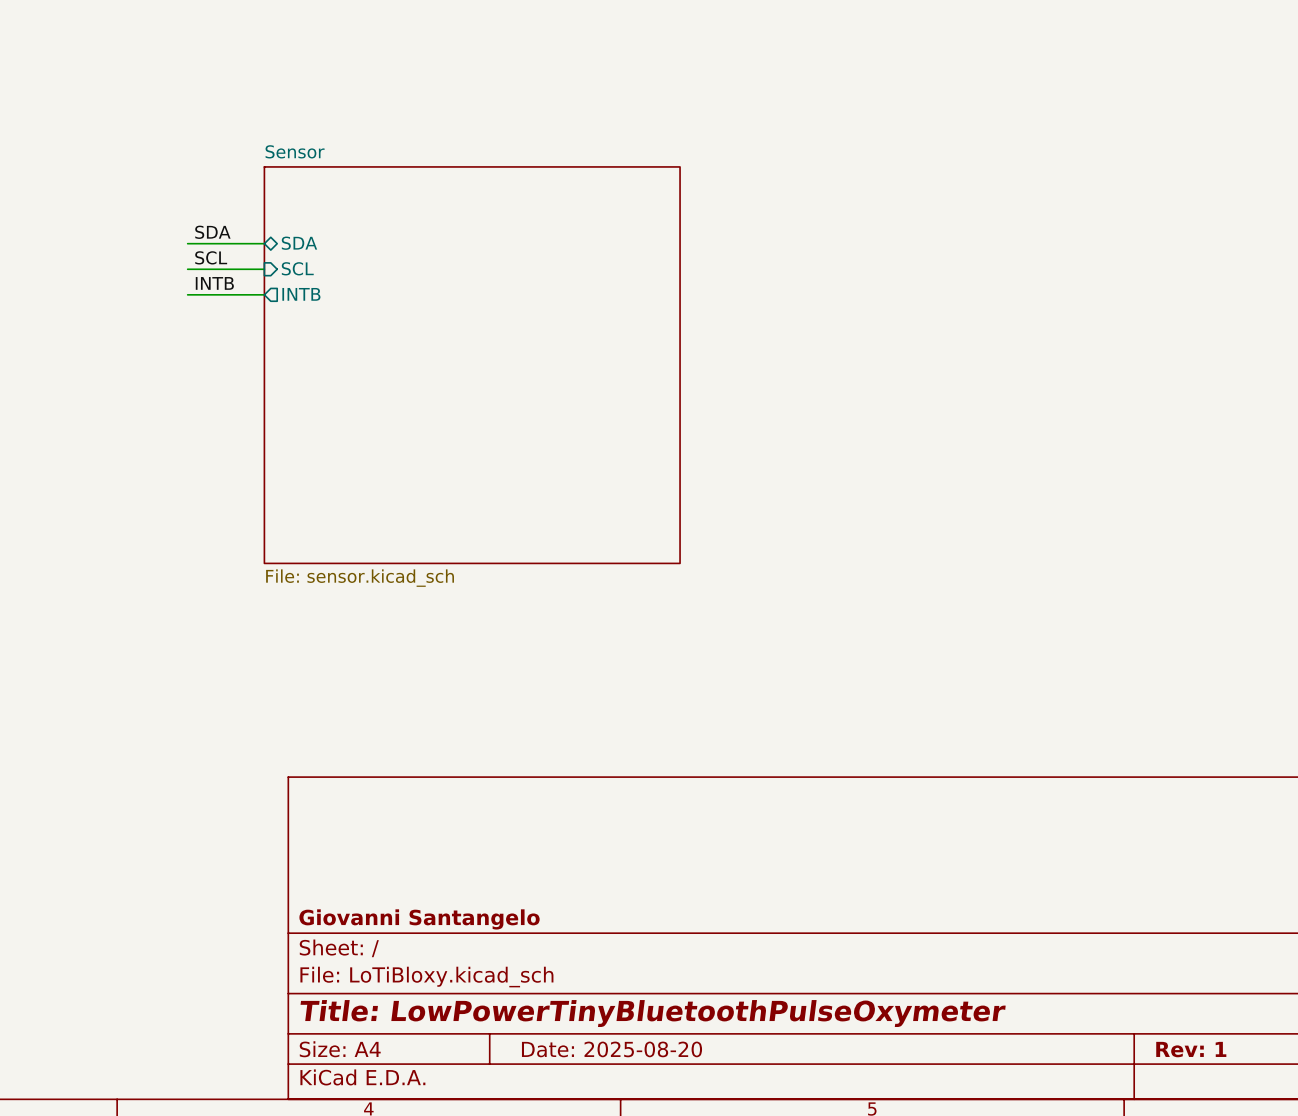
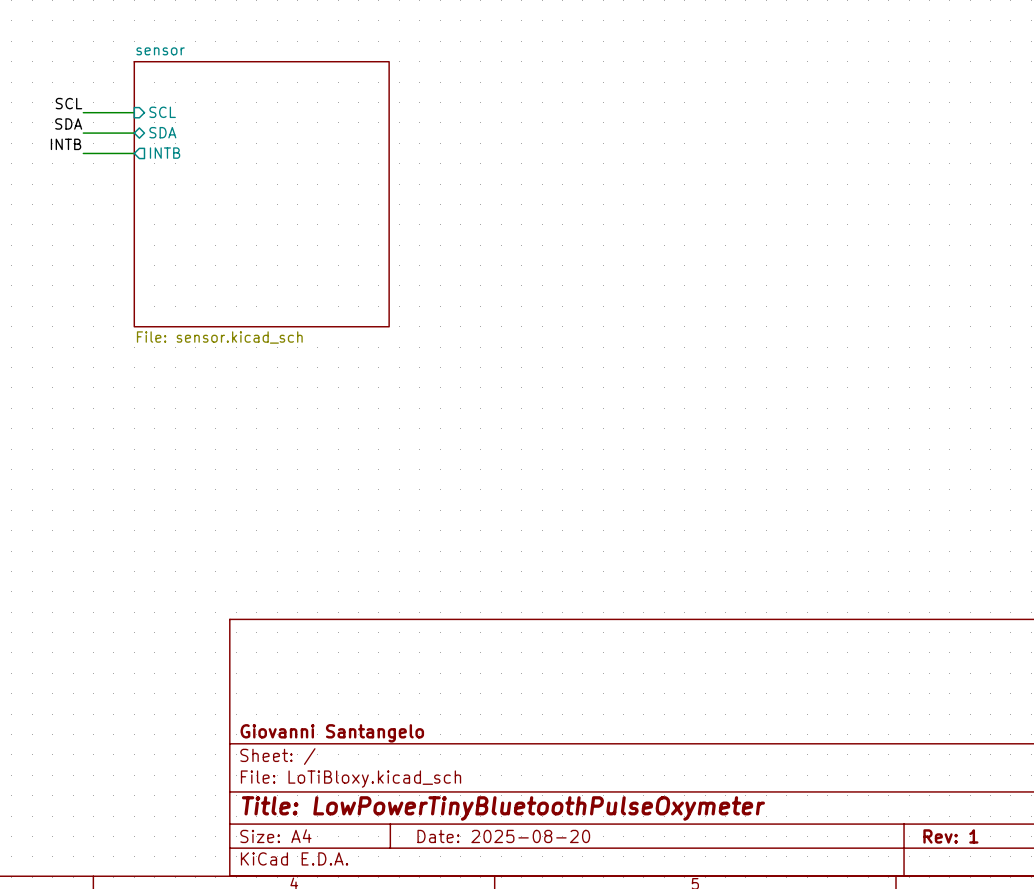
wire: none -> (83, 112) (134, 112)
wire: none -> (83, 133) (134, 133)
wire: none -> (83, 153) (134, 153)
label position: SDA (212, 232) -> SDA (68, 123)
wire: (187, 243) (264, 243) -> none
sheet pin position: SDA (299, 243) -> SDA (162, 132)
sheet sensor: none -> File: sensor.kicad_sch (261, 194)
label position: SCL (211, 257) -> SCL (68, 103)
sheet pin position: SCL (297, 268) -> SCL (162, 112)
wire: (187, 269) (264, 269) -> none
label position: INTB (214, 283) -> INTB (66, 144)
wire: (187, 294) (264, 294) -> none
sheet pin position: INTB (301, 294) -> INTB (165, 153)
sheet Sensor: File: sensor.kicad_sch (472, 365) -> none

